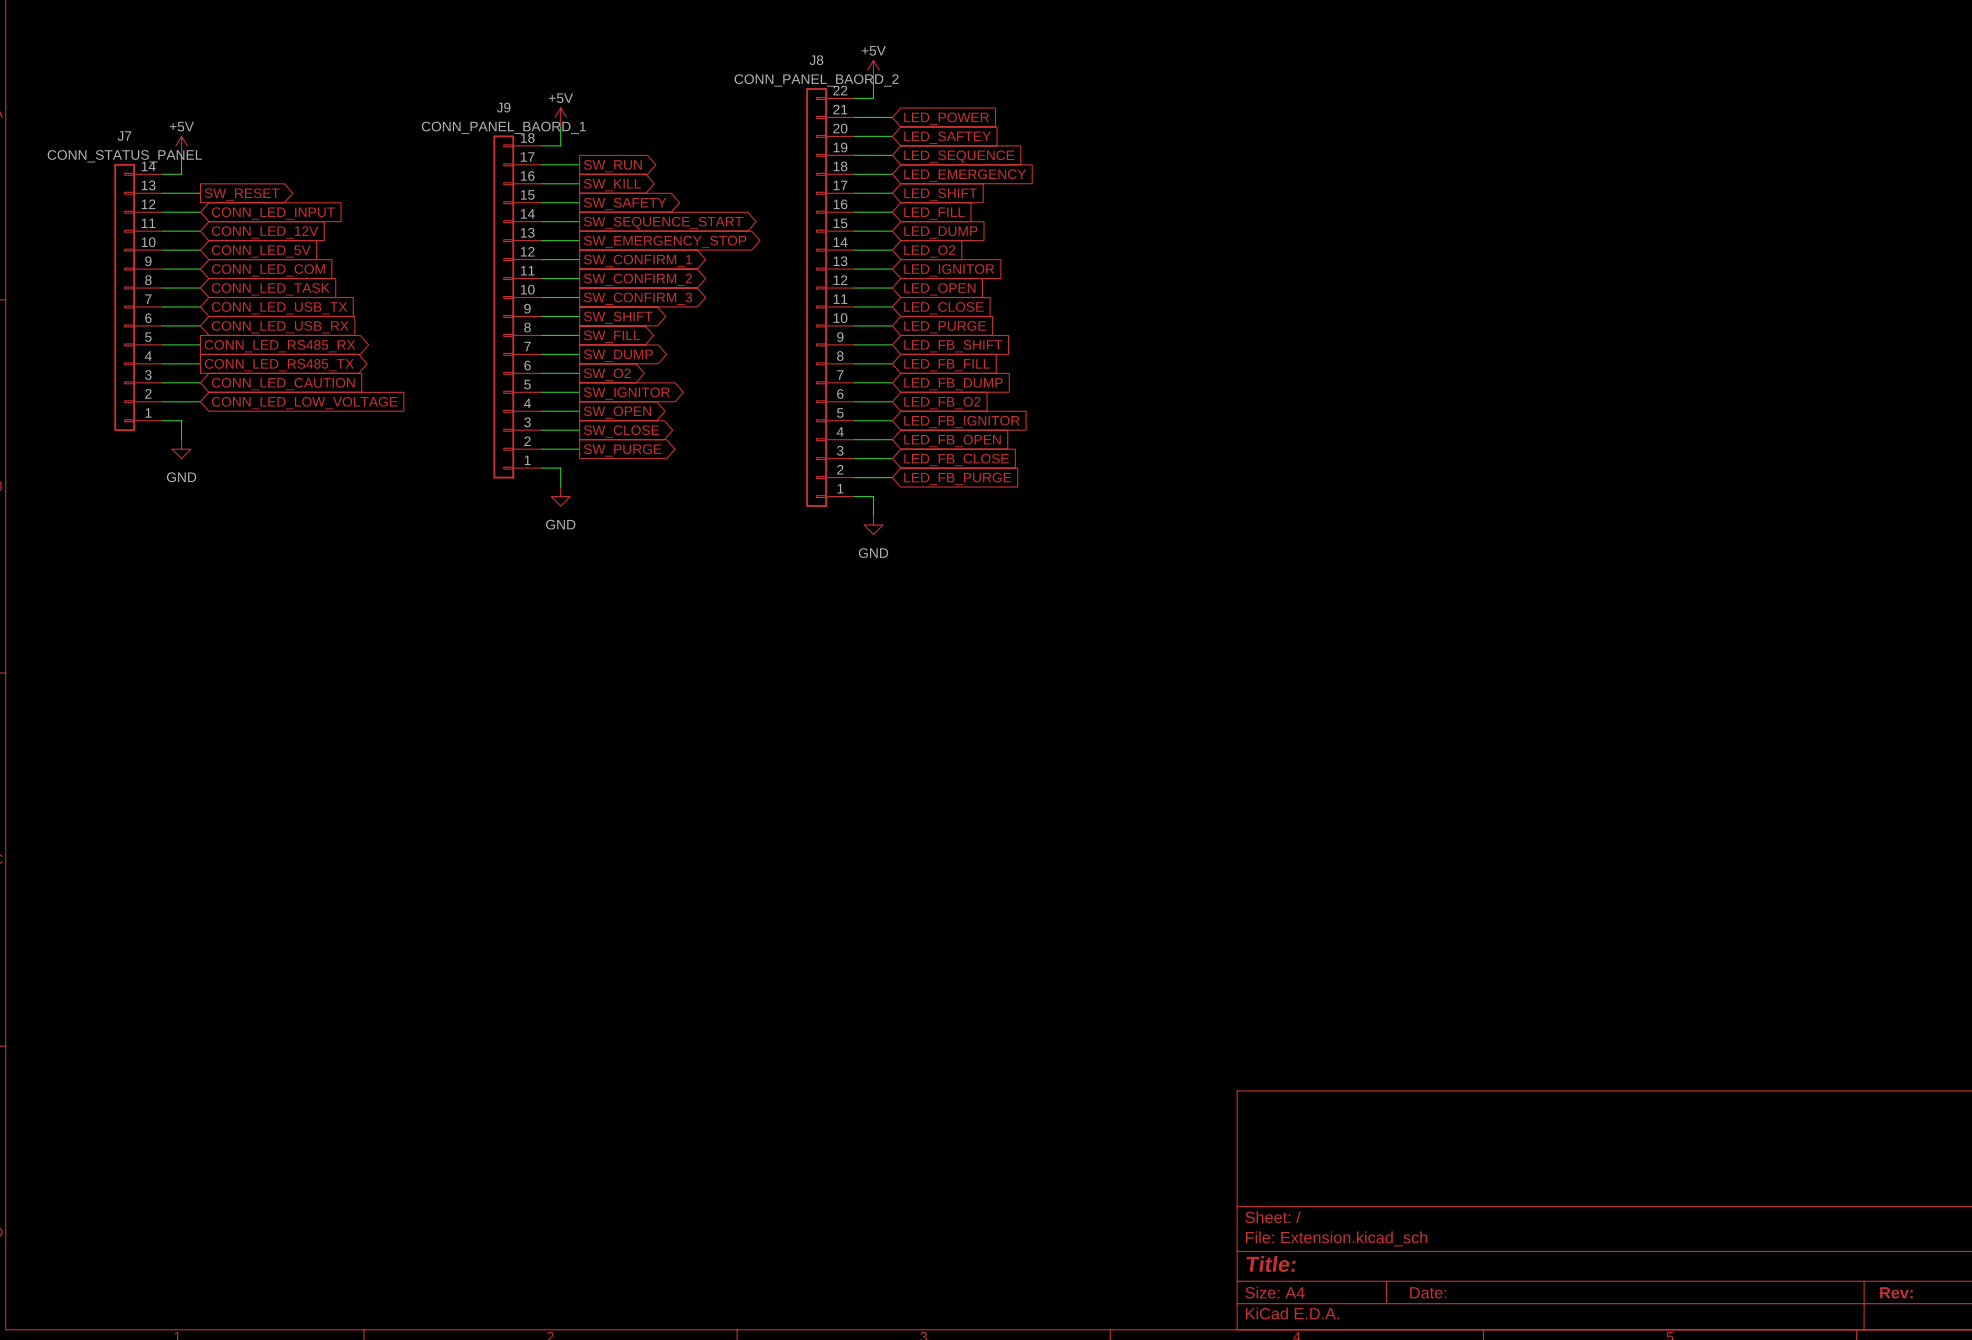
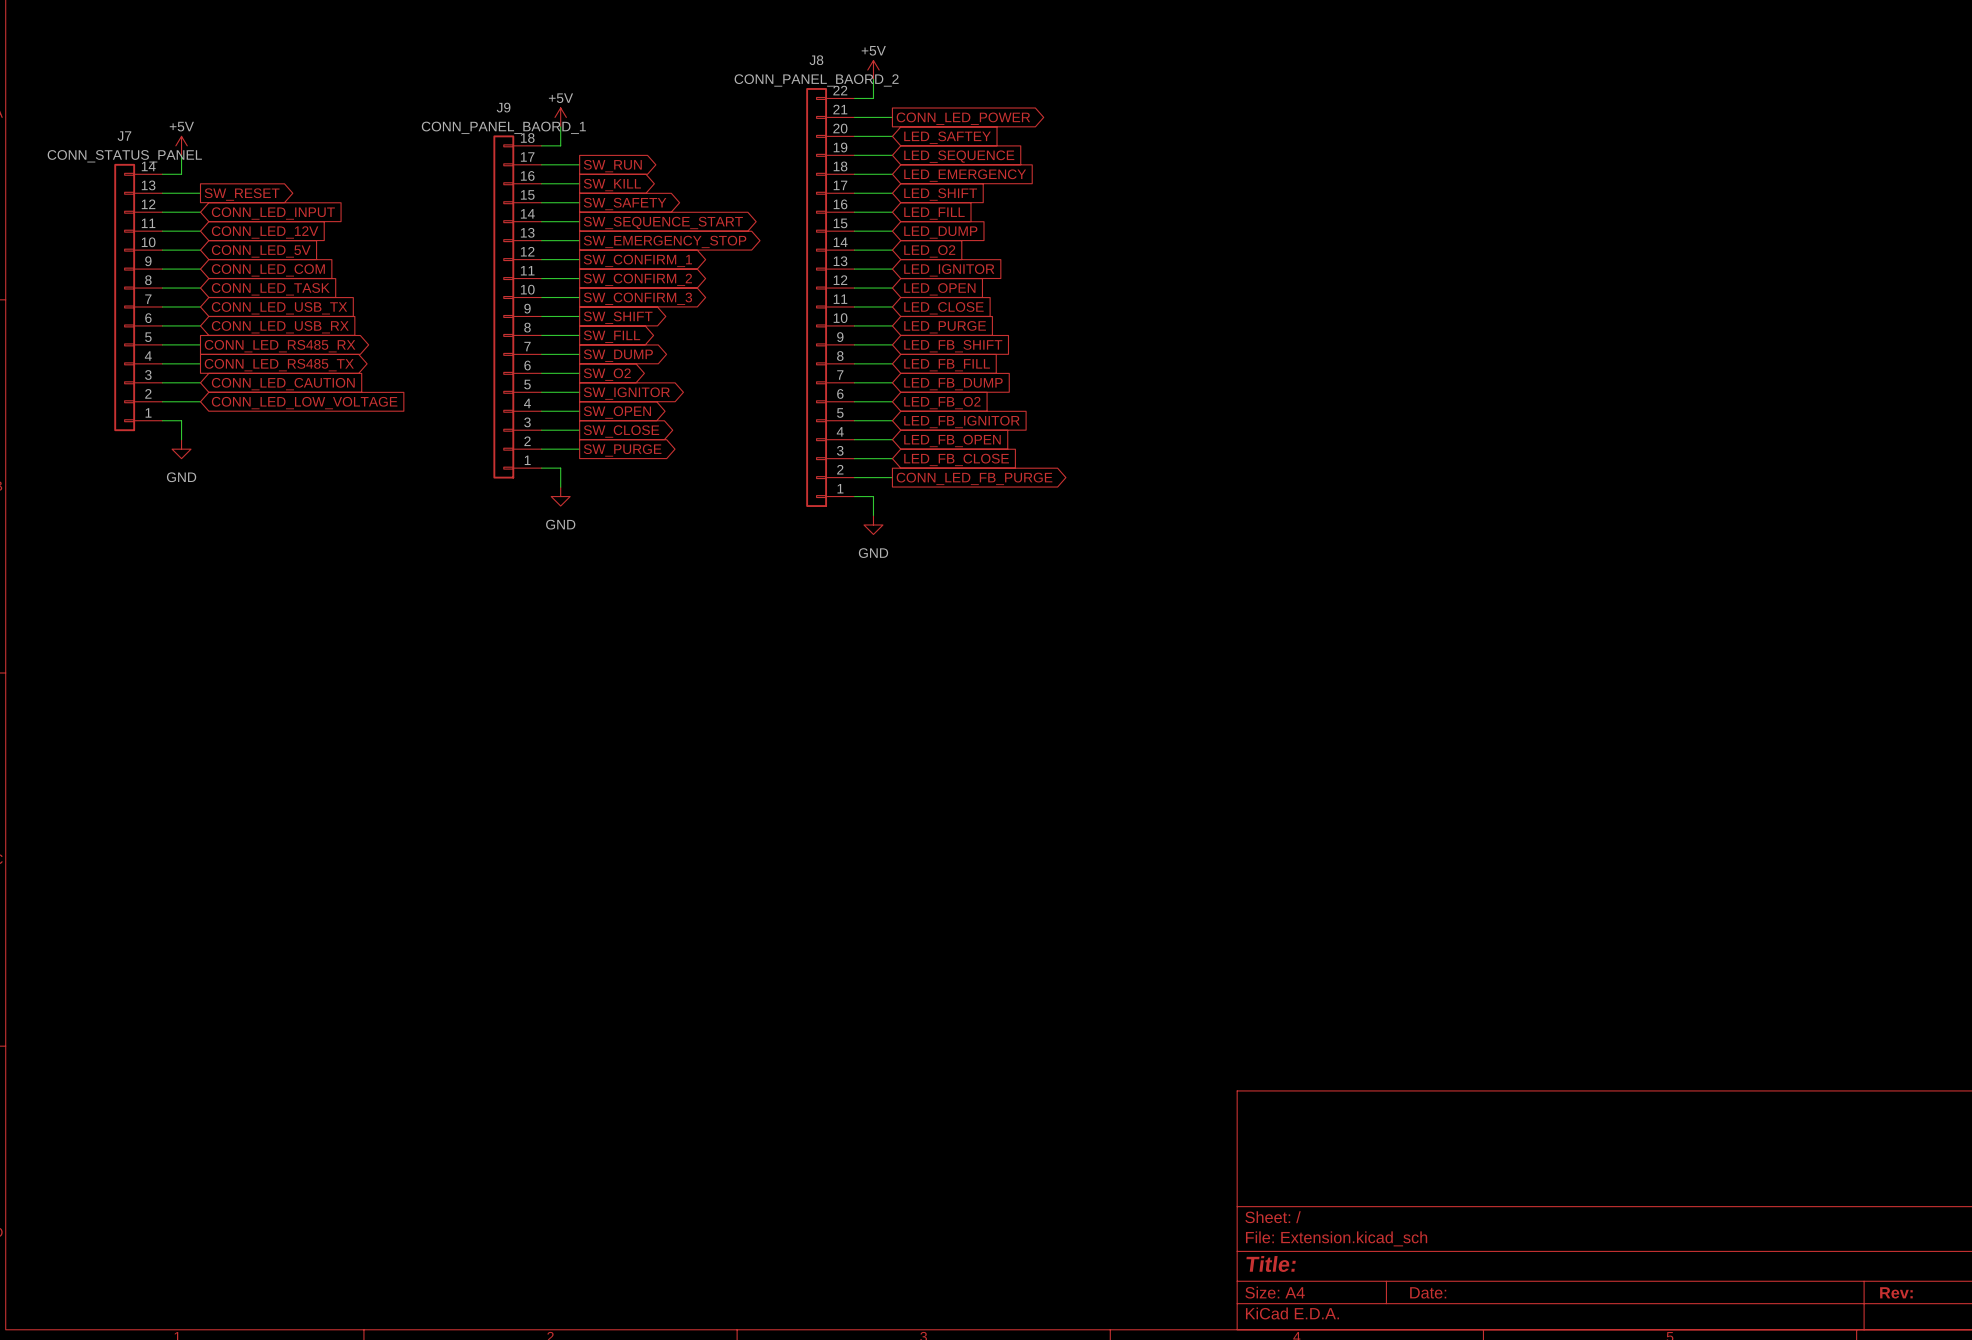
global label shape: input (946, 118) -> output (963, 118)
global label: LED_POWER (946, 118) -> CONN_LED_POWER (963, 118)
global label shape: input (957, 478) -> output (974, 478)
global label: LED_FB_PURGE (957, 478) -> CONN_LED_FB_PURGE (974, 478)

